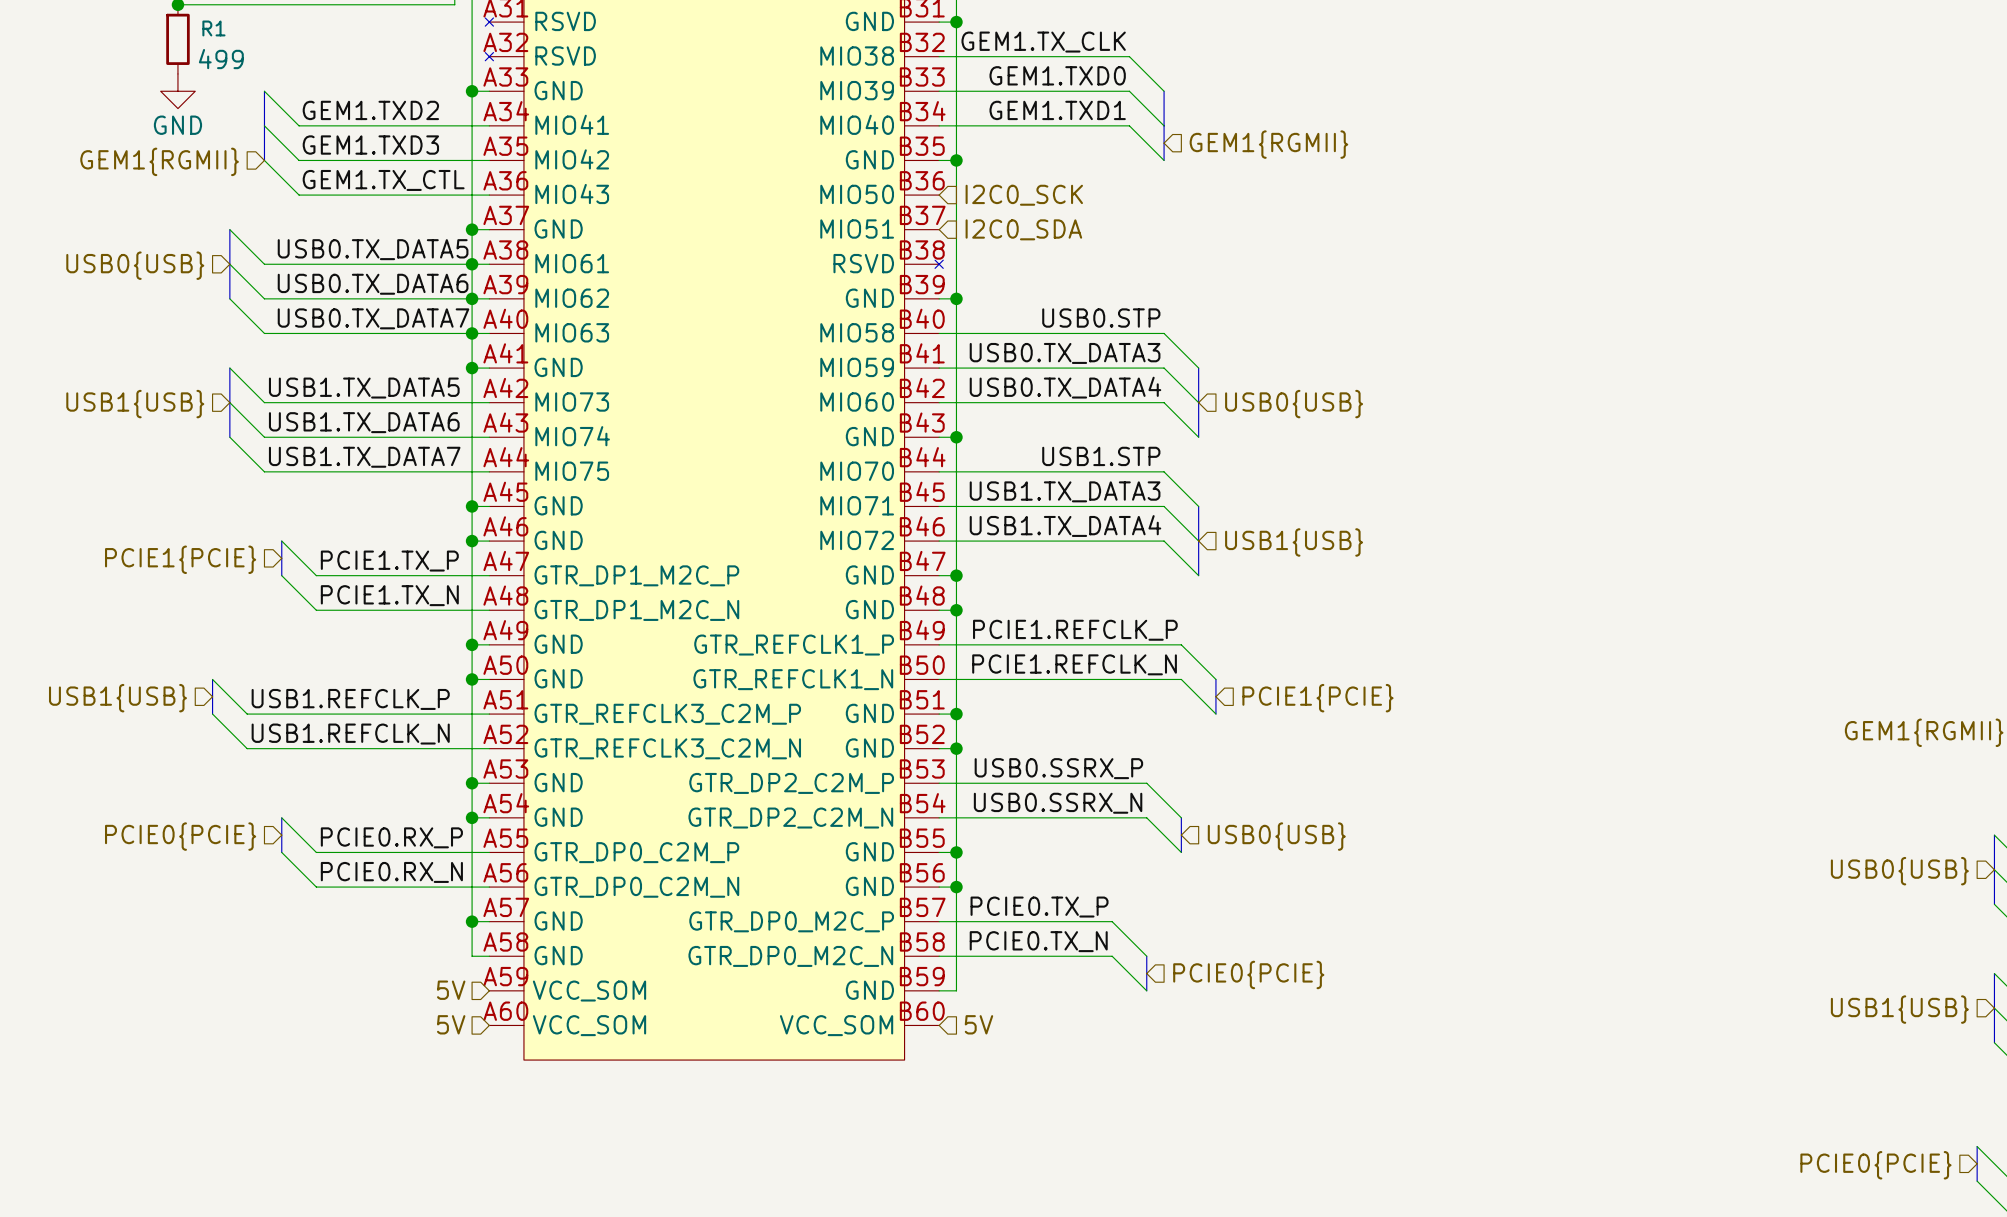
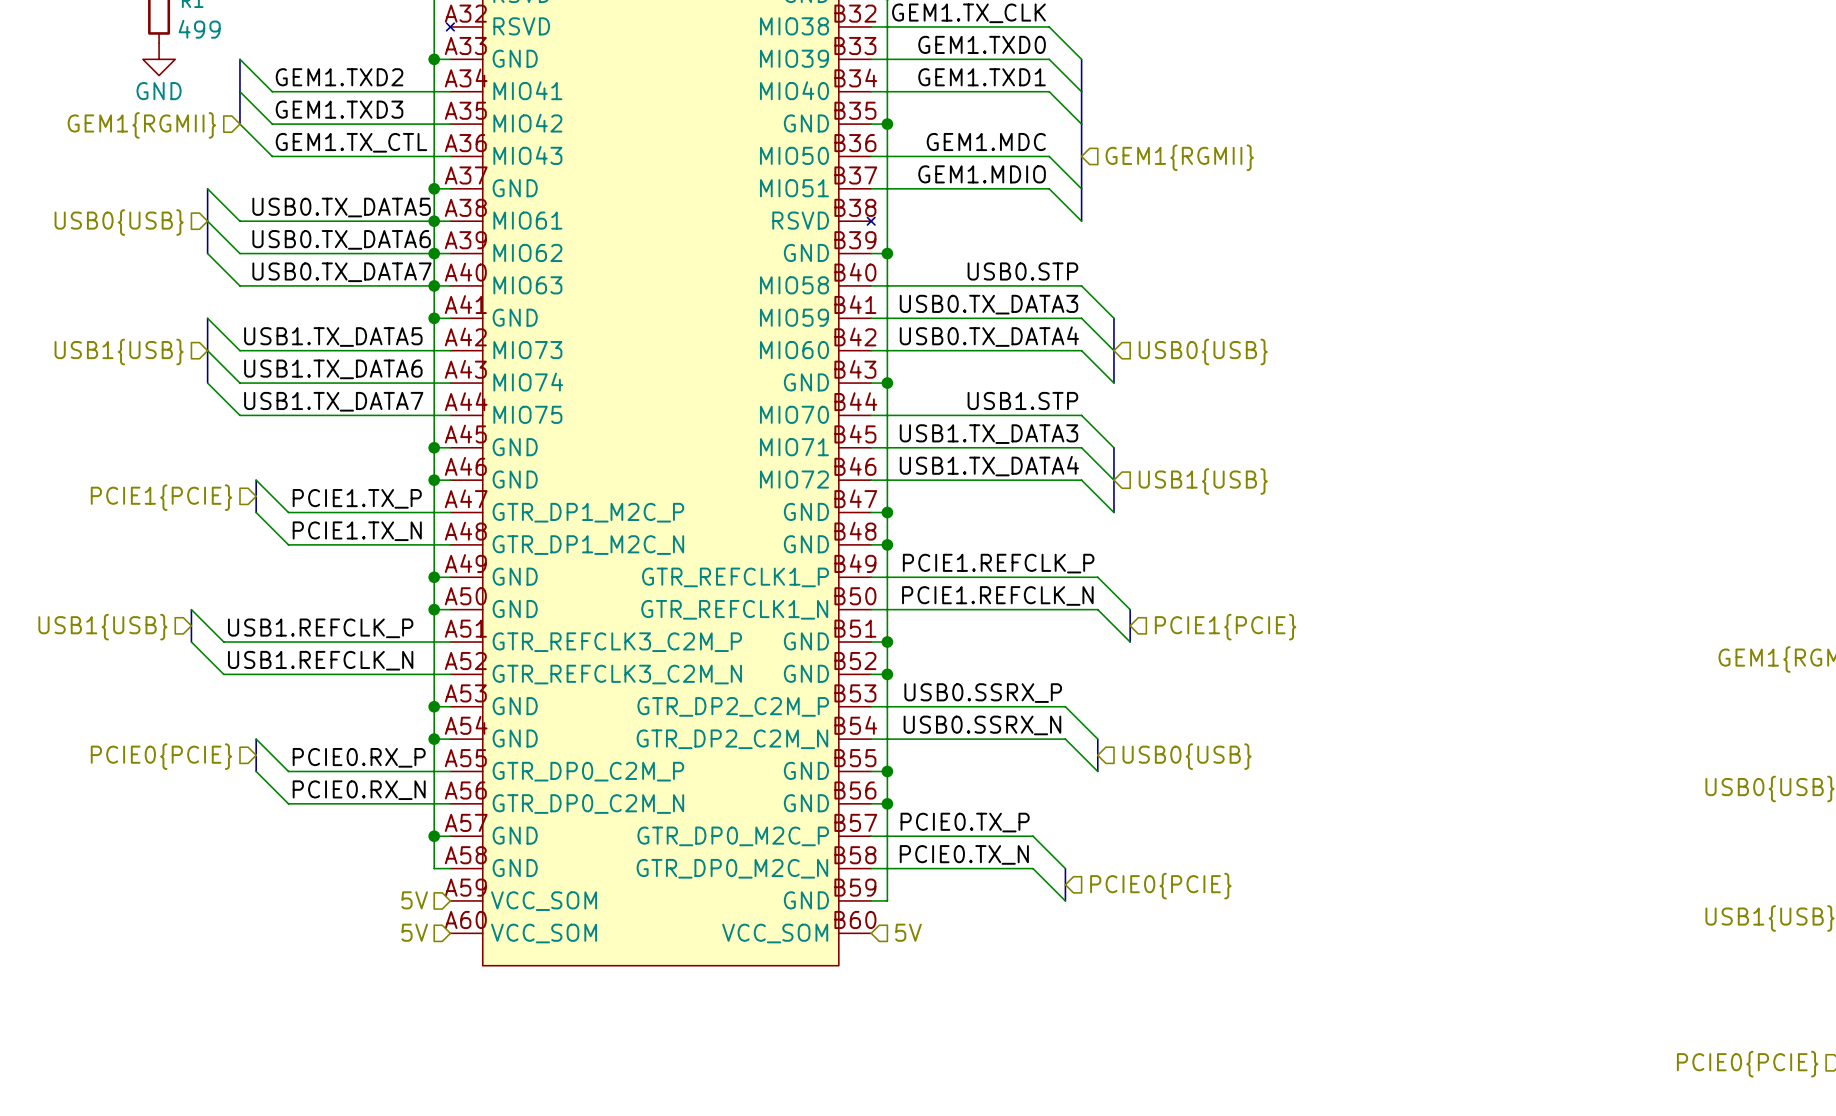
hierarchical label position: GEM1{RGMII} (1268, 144) -> GEM1{RGMII} (1179, 157)
bus: none -> (1081, 124) (1081, 221)
label: none -> GEM1.MDC (986, 142)
wire: none -> (871, 156) (1049, 156) (1081, 188)
hierarchical label: I2C0_SCK (1024, 195) -> none
label: none -> GEM1.MDIO (982, 174)
wire: none -> (871, 188) (1049, 188) (1081, 221)
hierarchical label: I2C0_SDA (1023, 229) -> none

